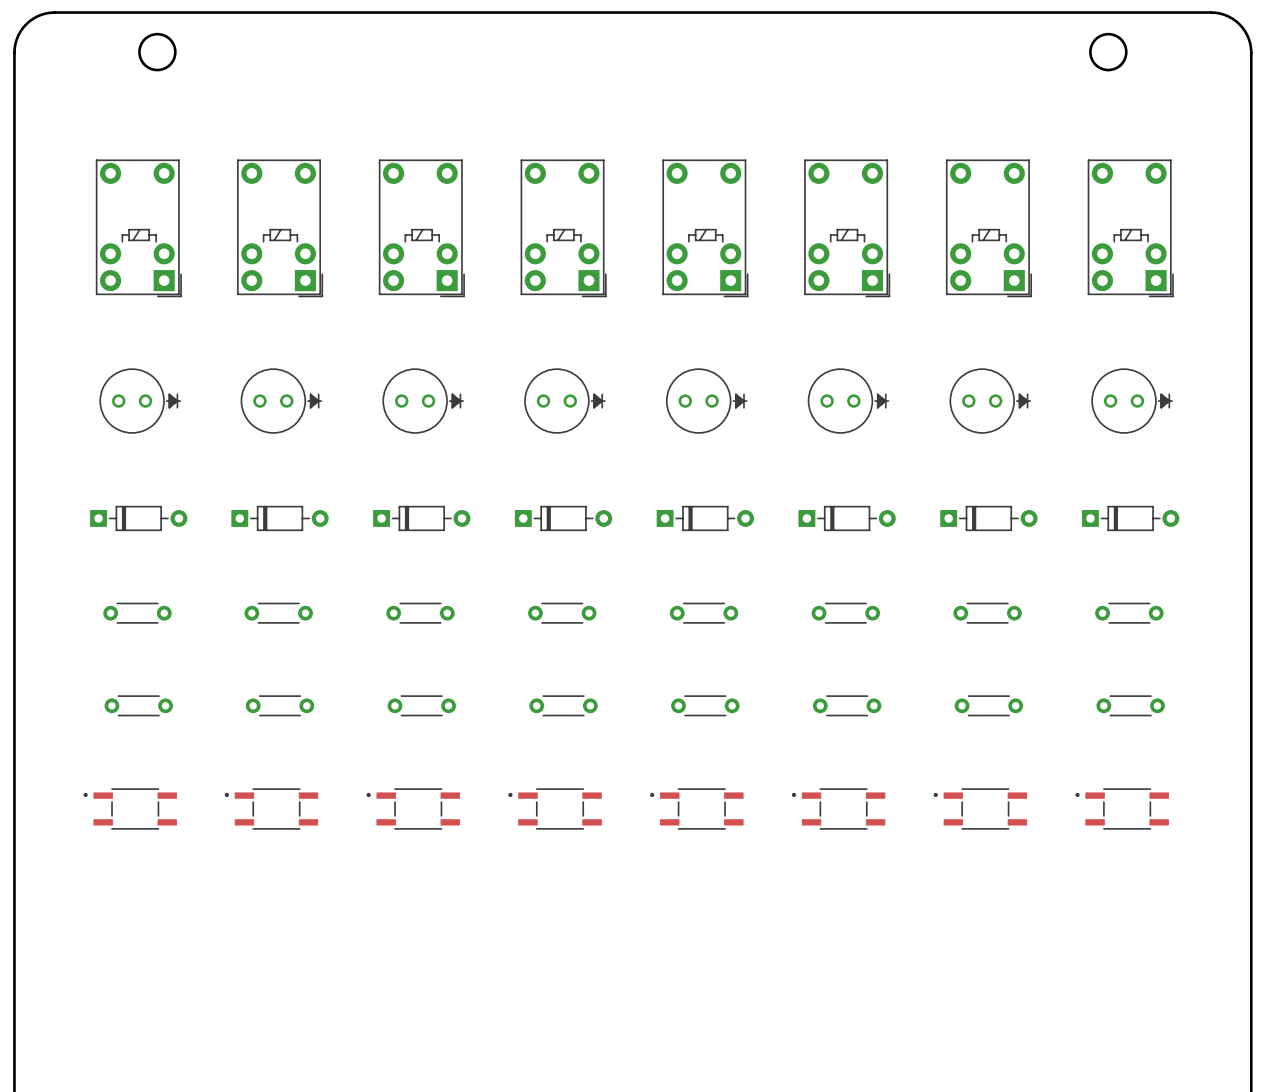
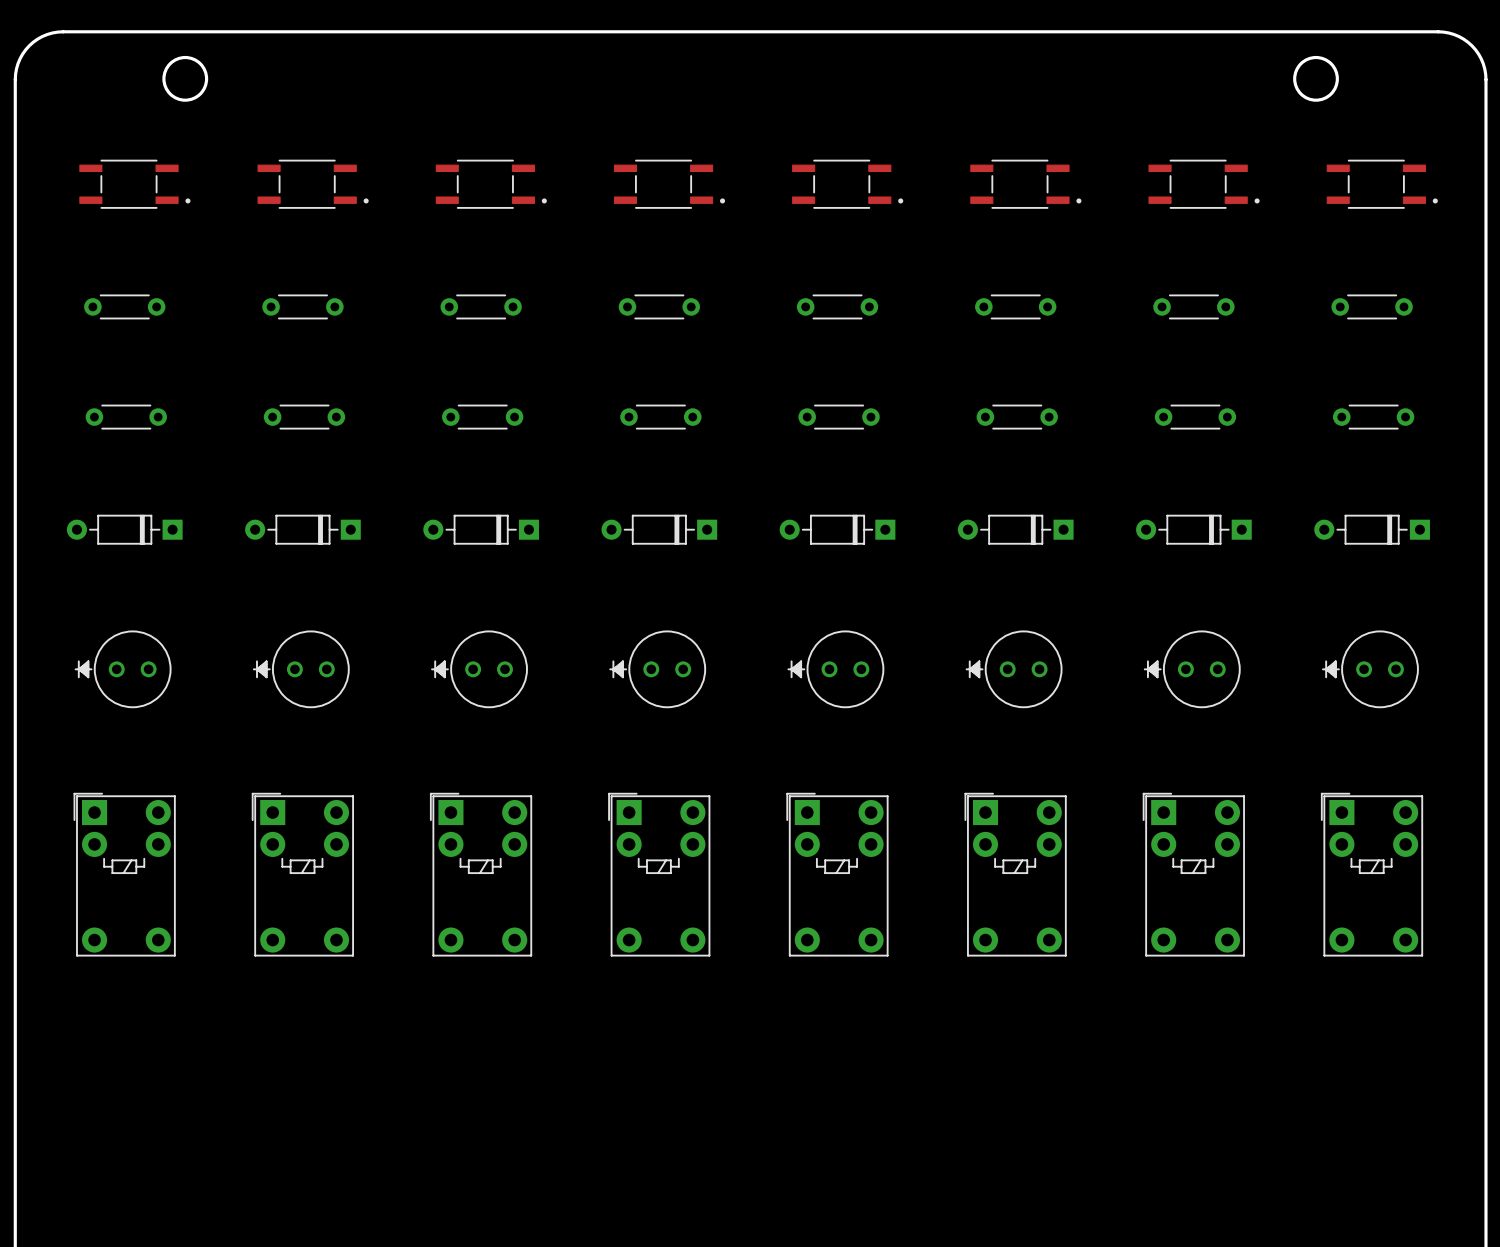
part: none -> (134, 184)
part: none -> (313, 184)
part: none -> (491, 184)
part: none -> (669, 184)
part: none -> (847, 184)
part: none -> (1025, 184)
part: none -> (1204, 184)
part: none -> (1382, 184)
part: (138, 228) -> none
part: (280, 228) -> none
part: (421, 228) -> none
part: (563, 228) -> none
part: (705, 228) -> none
part: (847, 228) -> none
part: (988, 228) -> none
part: (1130, 228) -> none
part: none -> (124, 306)
part: none -> (302, 306)
part: none -> (481, 306)
part: none -> (659, 306)
part: none -> (837, 306)
part: none -> (1015, 306)
part: none -> (1193, 306)
part: none -> (1372, 306)
part: none -> (126, 417)
part: none -> (304, 417)
part: none -> (482, 417)
part: none -> (660, 417)
part: none -> (839, 417)
part: none -> (1017, 417)
part: none -> (1195, 417)
part: none -> (1373, 417)
part: (140, 401) -> none
part: (281, 401) -> none
part: (423, 401) -> none
part: (564, 401) -> none
part: (706, 401) -> none
part: (848, 401) -> none
part: (990, 401) -> none
part: (1132, 401) -> none
part: none -> (124, 529)
part: none -> (302, 529)
part: none -> (481, 529)
part: none -> (659, 529)
part: none -> (837, 529)
part: none -> (1015, 529)
part: none -> (1193, 529)
part: none -> (1372, 529)
part: (138, 518) -> none
part: (280, 518) -> none
part: (421, 518) -> none
part: (563, 518) -> none
part: (705, 518) -> none
part: (847, 518) -> none
part: (988, 518) -> none
part: (1130, 518) -> none
part: none -> (123, 669)
part: none -> (301, 669)
part: none -> (479, 669)
part: none -> (657, 669)
part: none -> (835, 669)
part: none -> (1014, 669)
part: none -> (1192, 669)
part: none -> (1370, 669)
part: (137, 613) -> none
part: (278, 613) -> none
part: (420, 613) -> none
part: (562, 613) -> none
part: (704, 613) -> none
part: (845, 613) -> none
part: (987, 613) -> none
part: (1129, 613) -> none
part: (138, 705) -> none
part: (280, 705) -> none
part: (421, 705) -> none
part: (563, 705) -> none
part: (705, 705) -> none
part: (847, 705) -> none
part: (988, 705) -> none
part: (1130, 705) -> none
part: none -> (124, 874)
part: none -> (302, 874)
part: none -> (481, 874)
part: none -> (659, 874)
part: none -> (837, 874)
part: none -> (1015, 874)
part: none -> (1193, 874)
part: none -> (1372, 874)
part: (130, 808) -> none
part: (271, 808) -> none
part: (413, 808) -> none
part: (555, 808) -> none
part: (696, 808) -> none
part: (838, 808) -> none
part: (980, 808) -> none
part: (1122, 808) -> none

